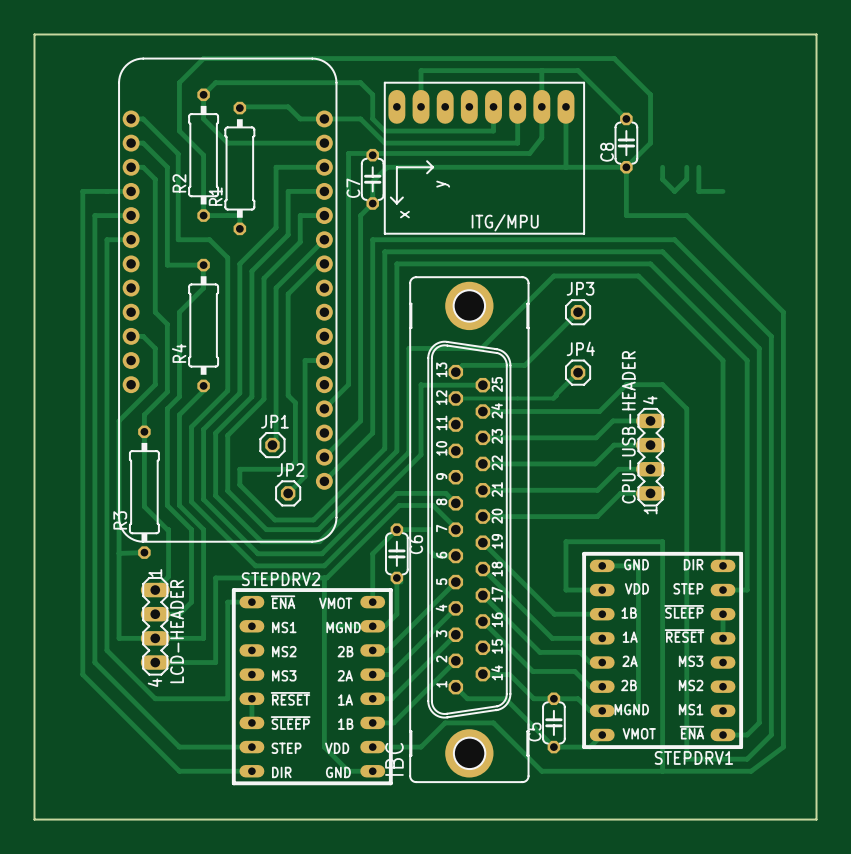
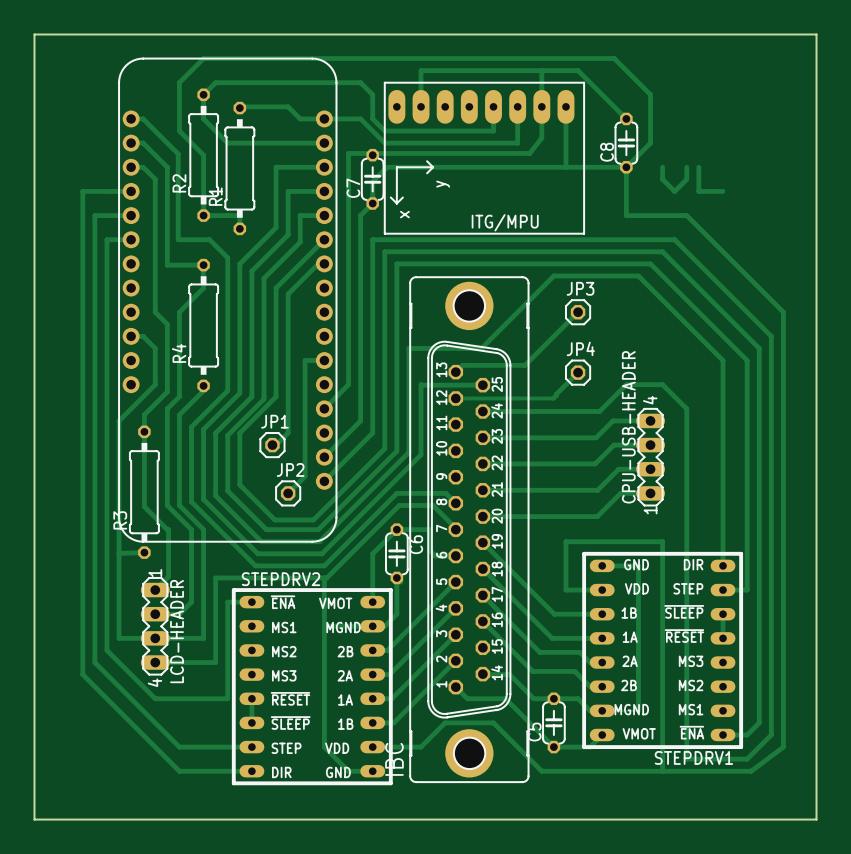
track: (288, 395) (295, 402) (295, 462) (288, 469) (239, 469) -> (276, 396) (239, 433) (239, 469)
track: none -> (288, 395) (288, 433) (276, 445)
track: (276, 396) (276, 441) (272, 445) -> none

